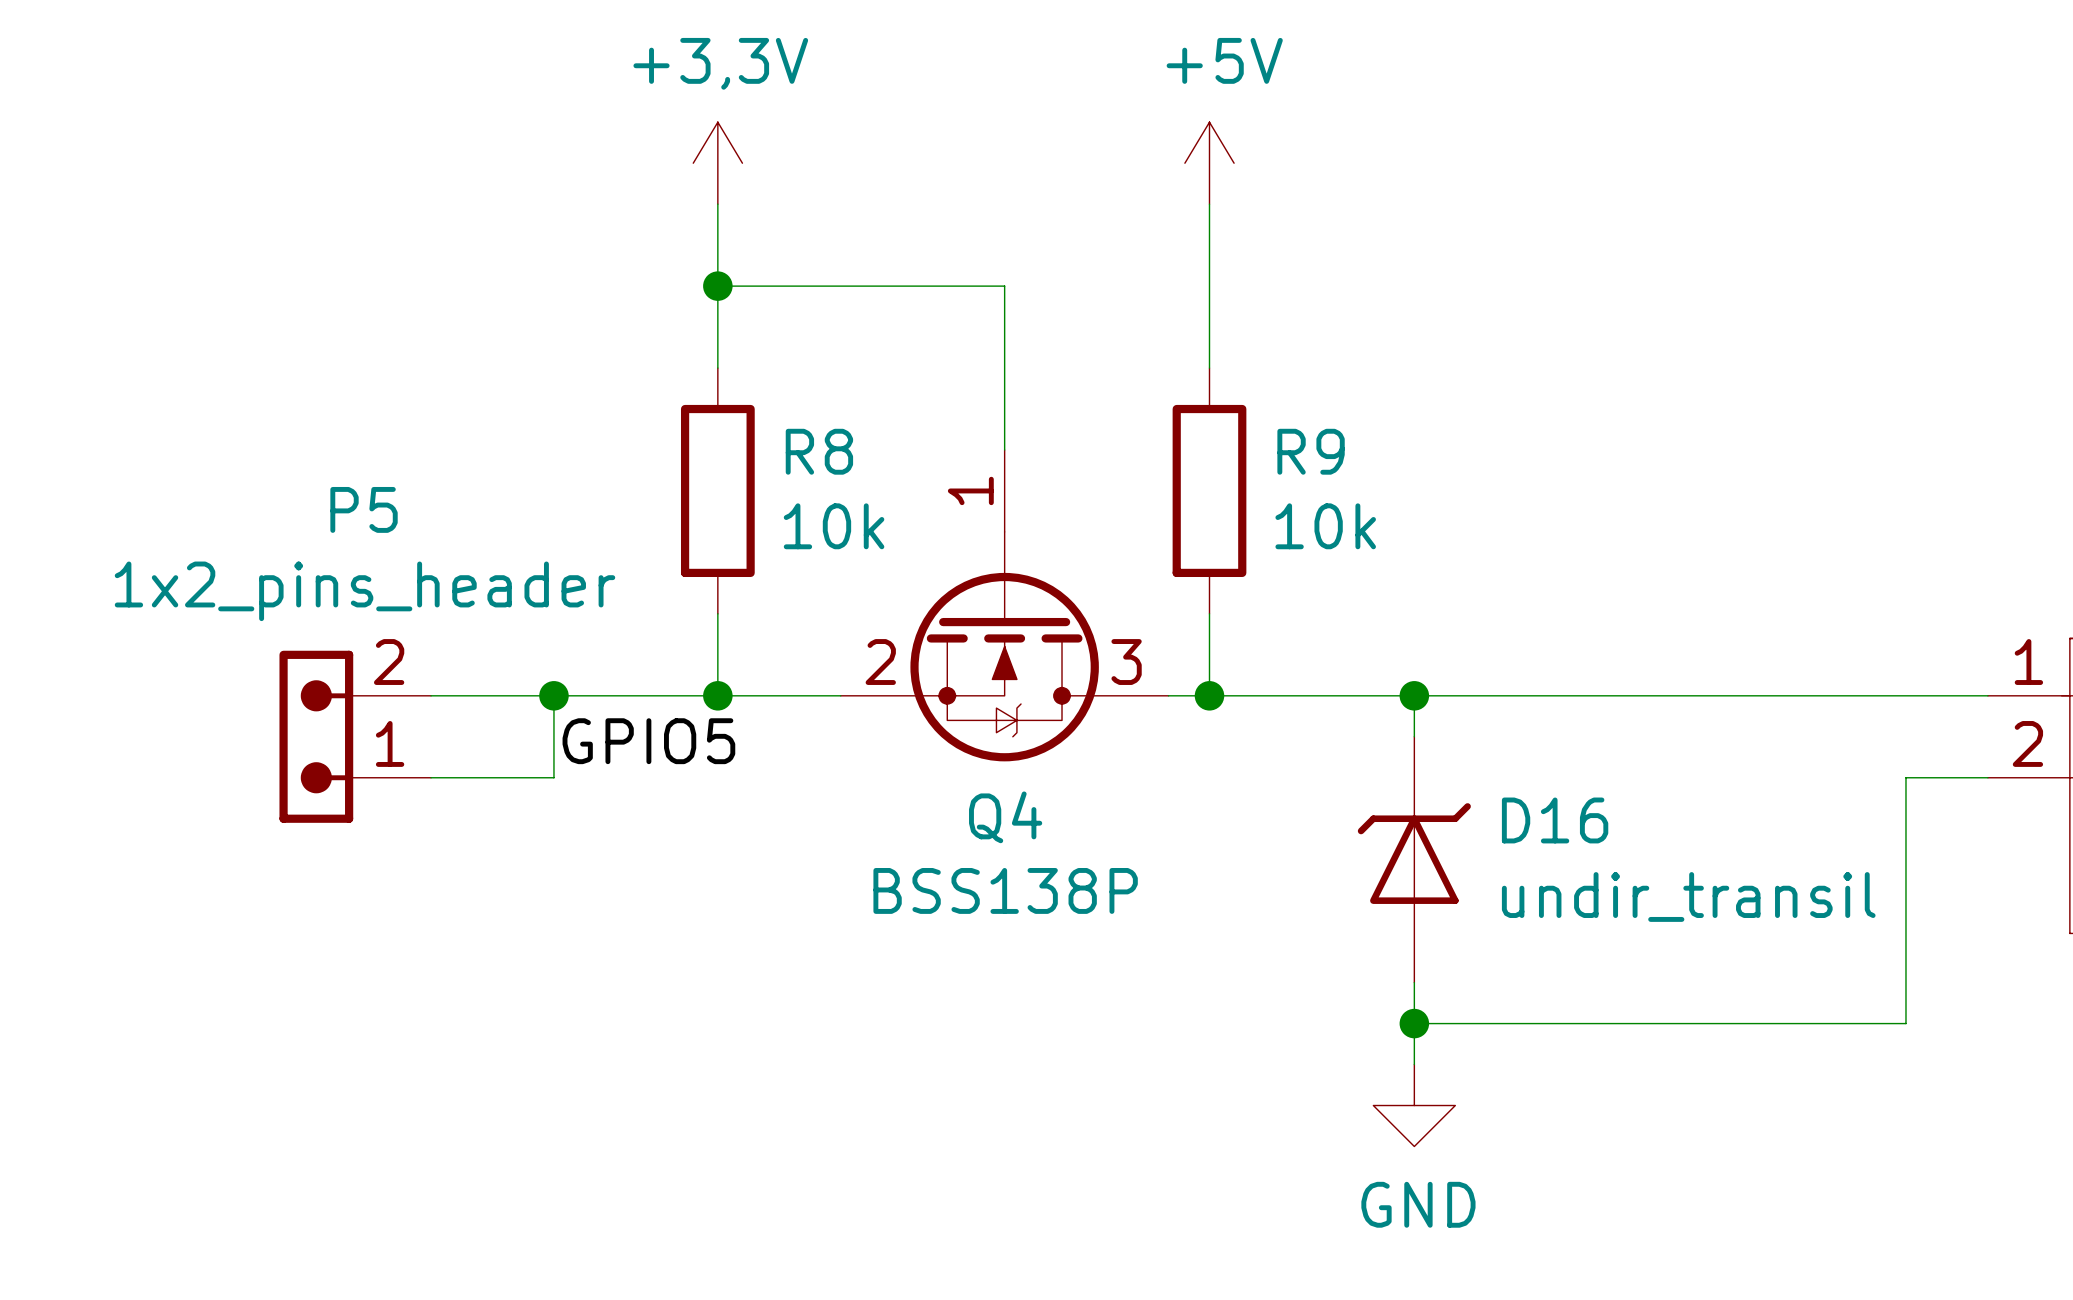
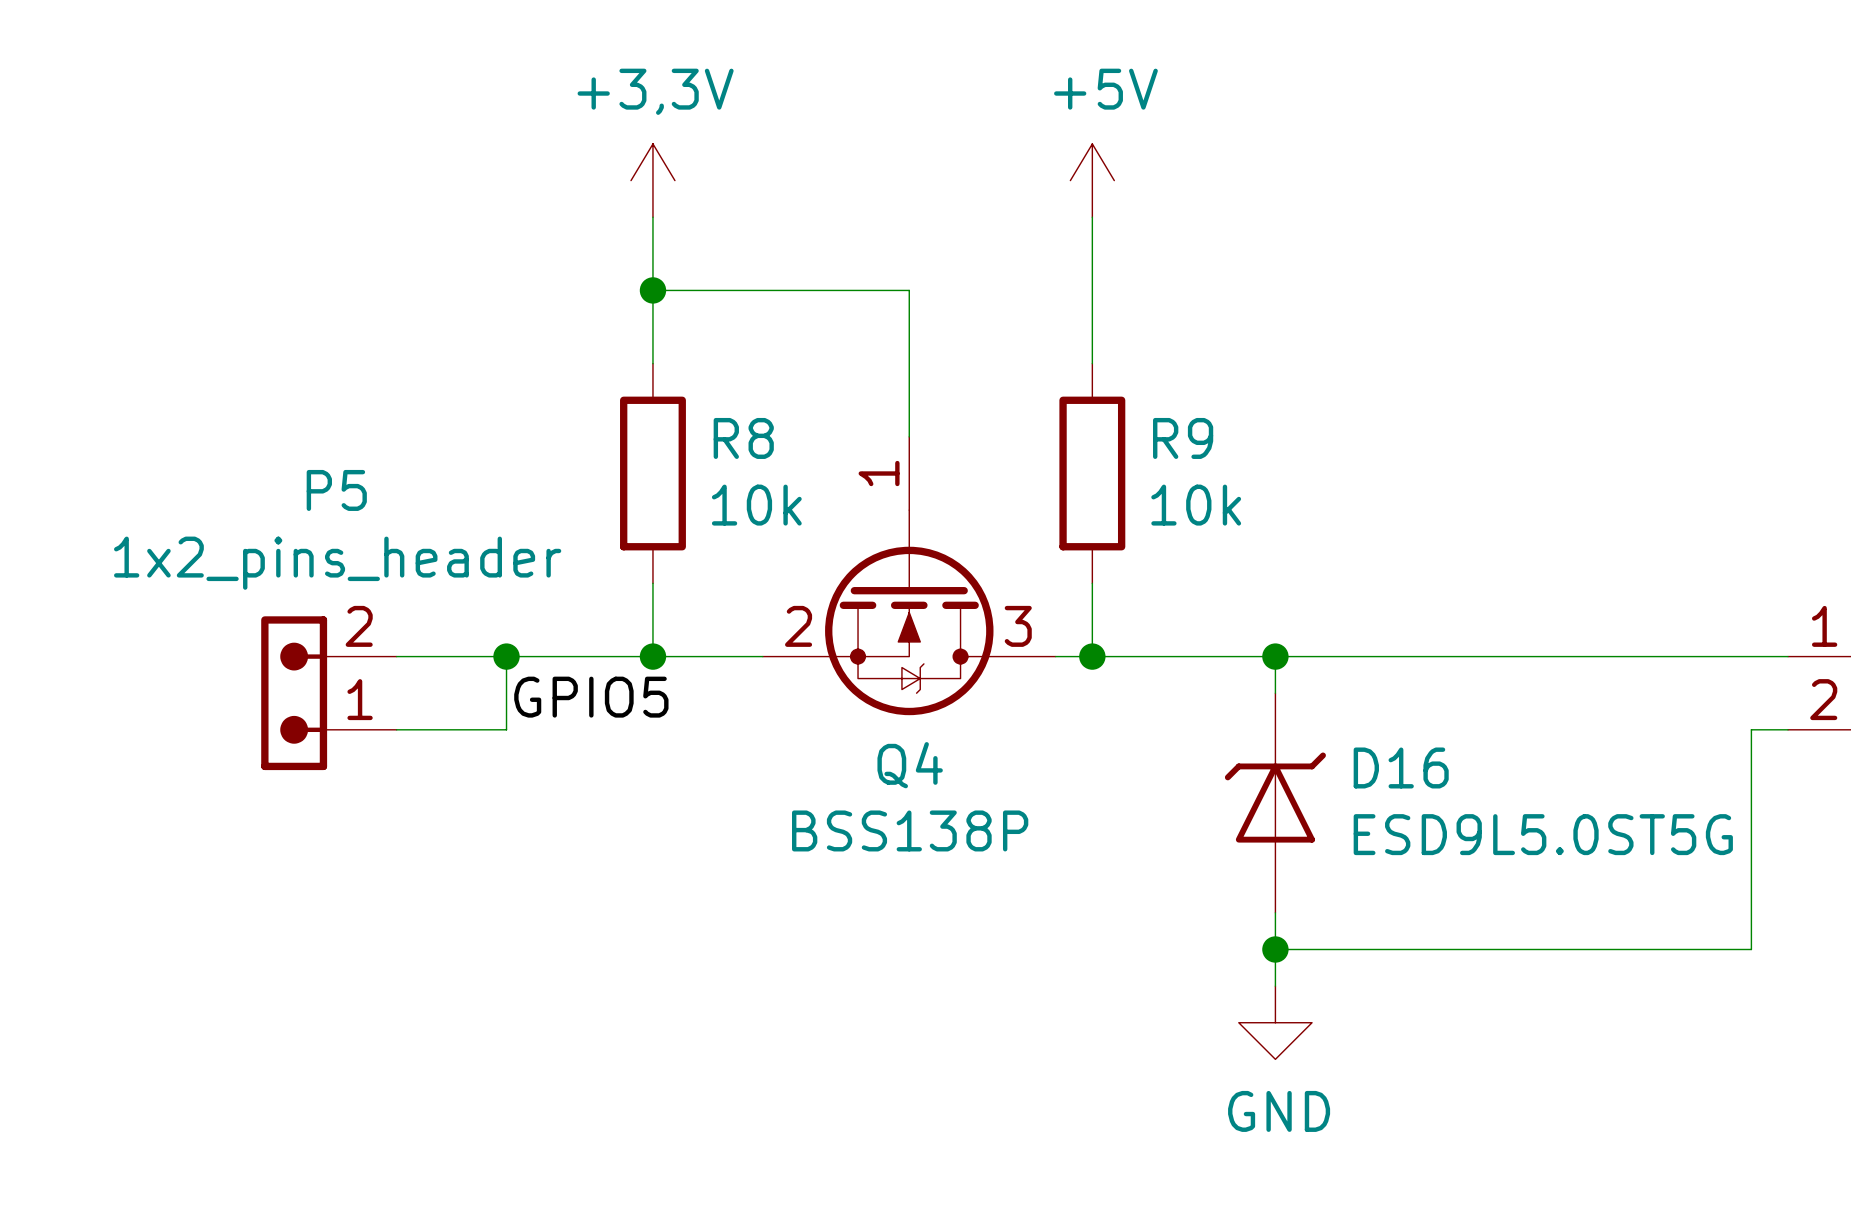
wire: (1946, 777) (1905, 777) (1905, 1023) -> (1751, 729) (1751, 949) (1714, 949)
D16 value: undir_transil (1688, 896) -> ESD9L5.0ST5G (1543, 834)

